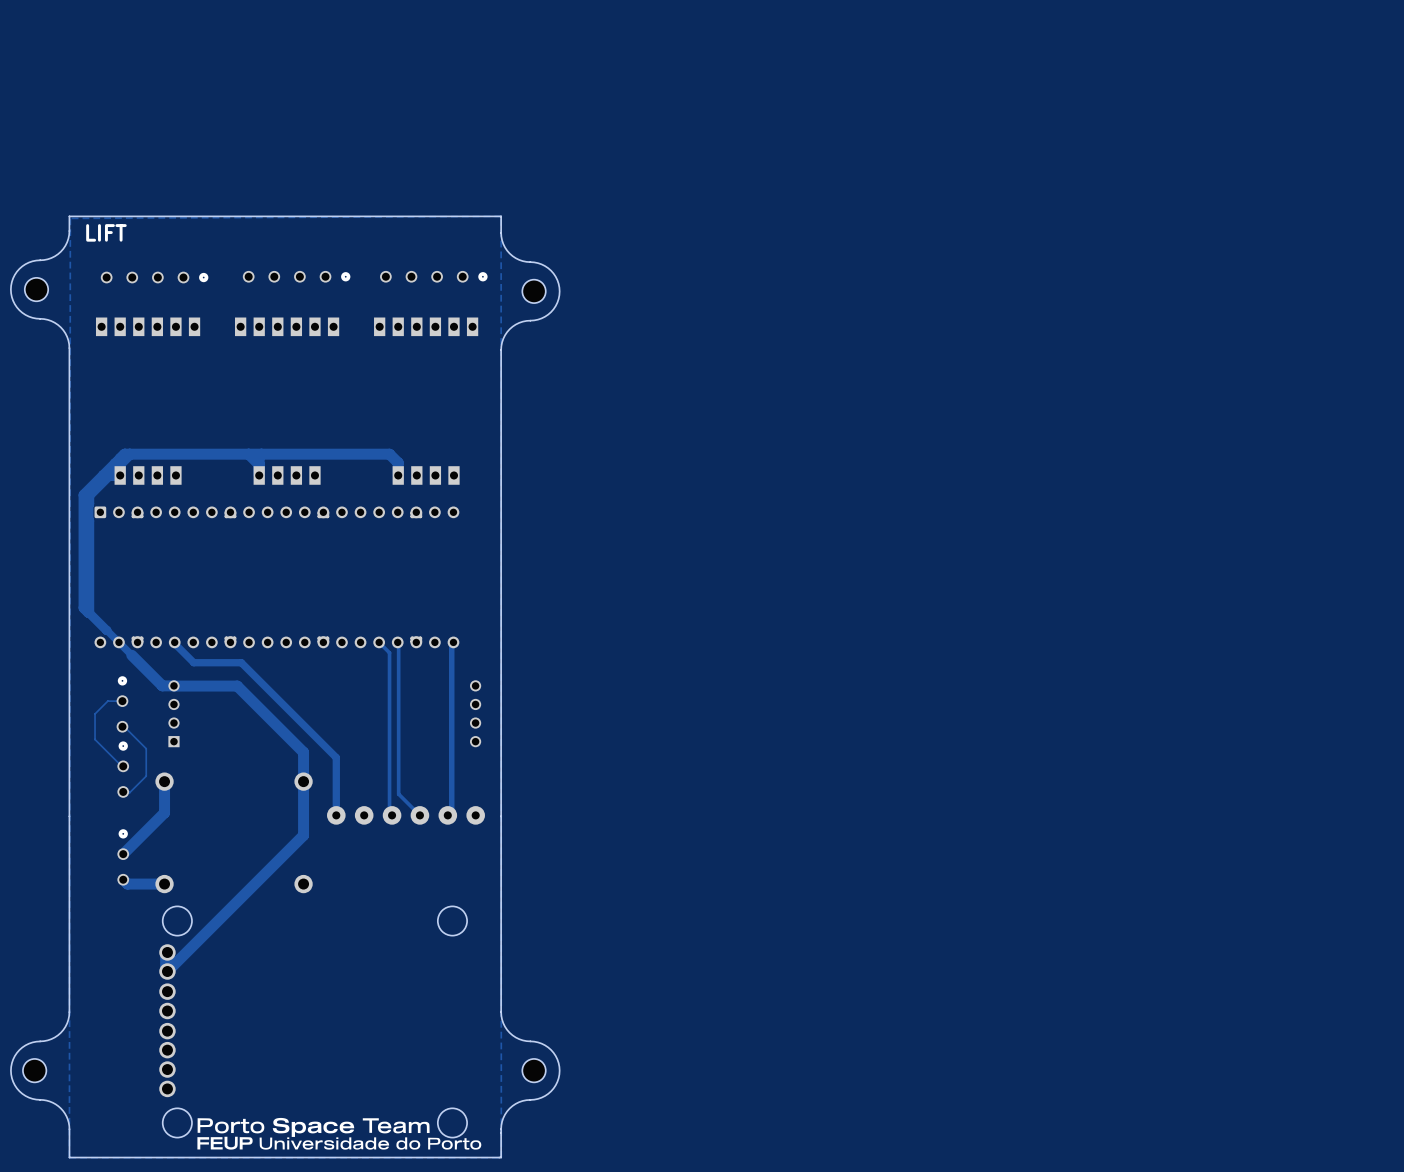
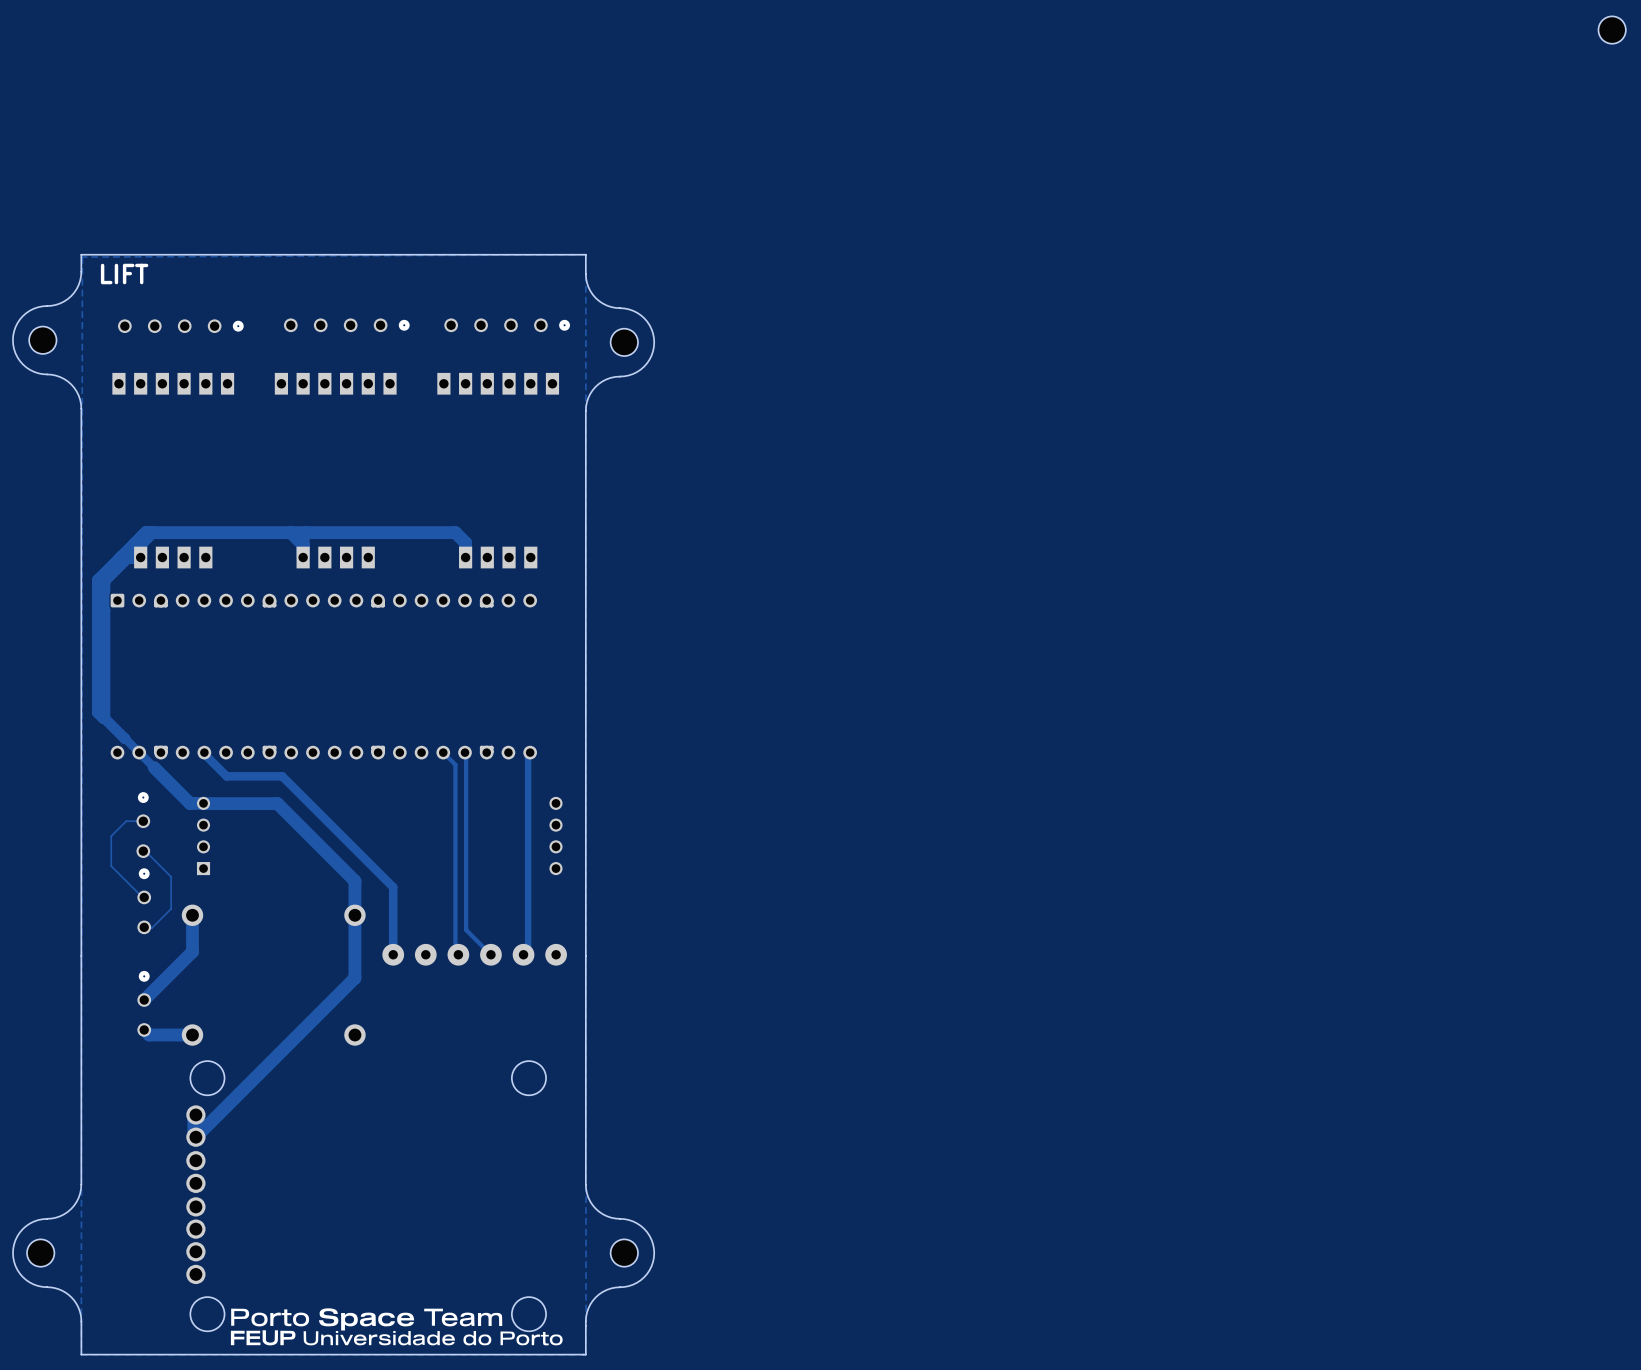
part: none -> (1612, 30)

